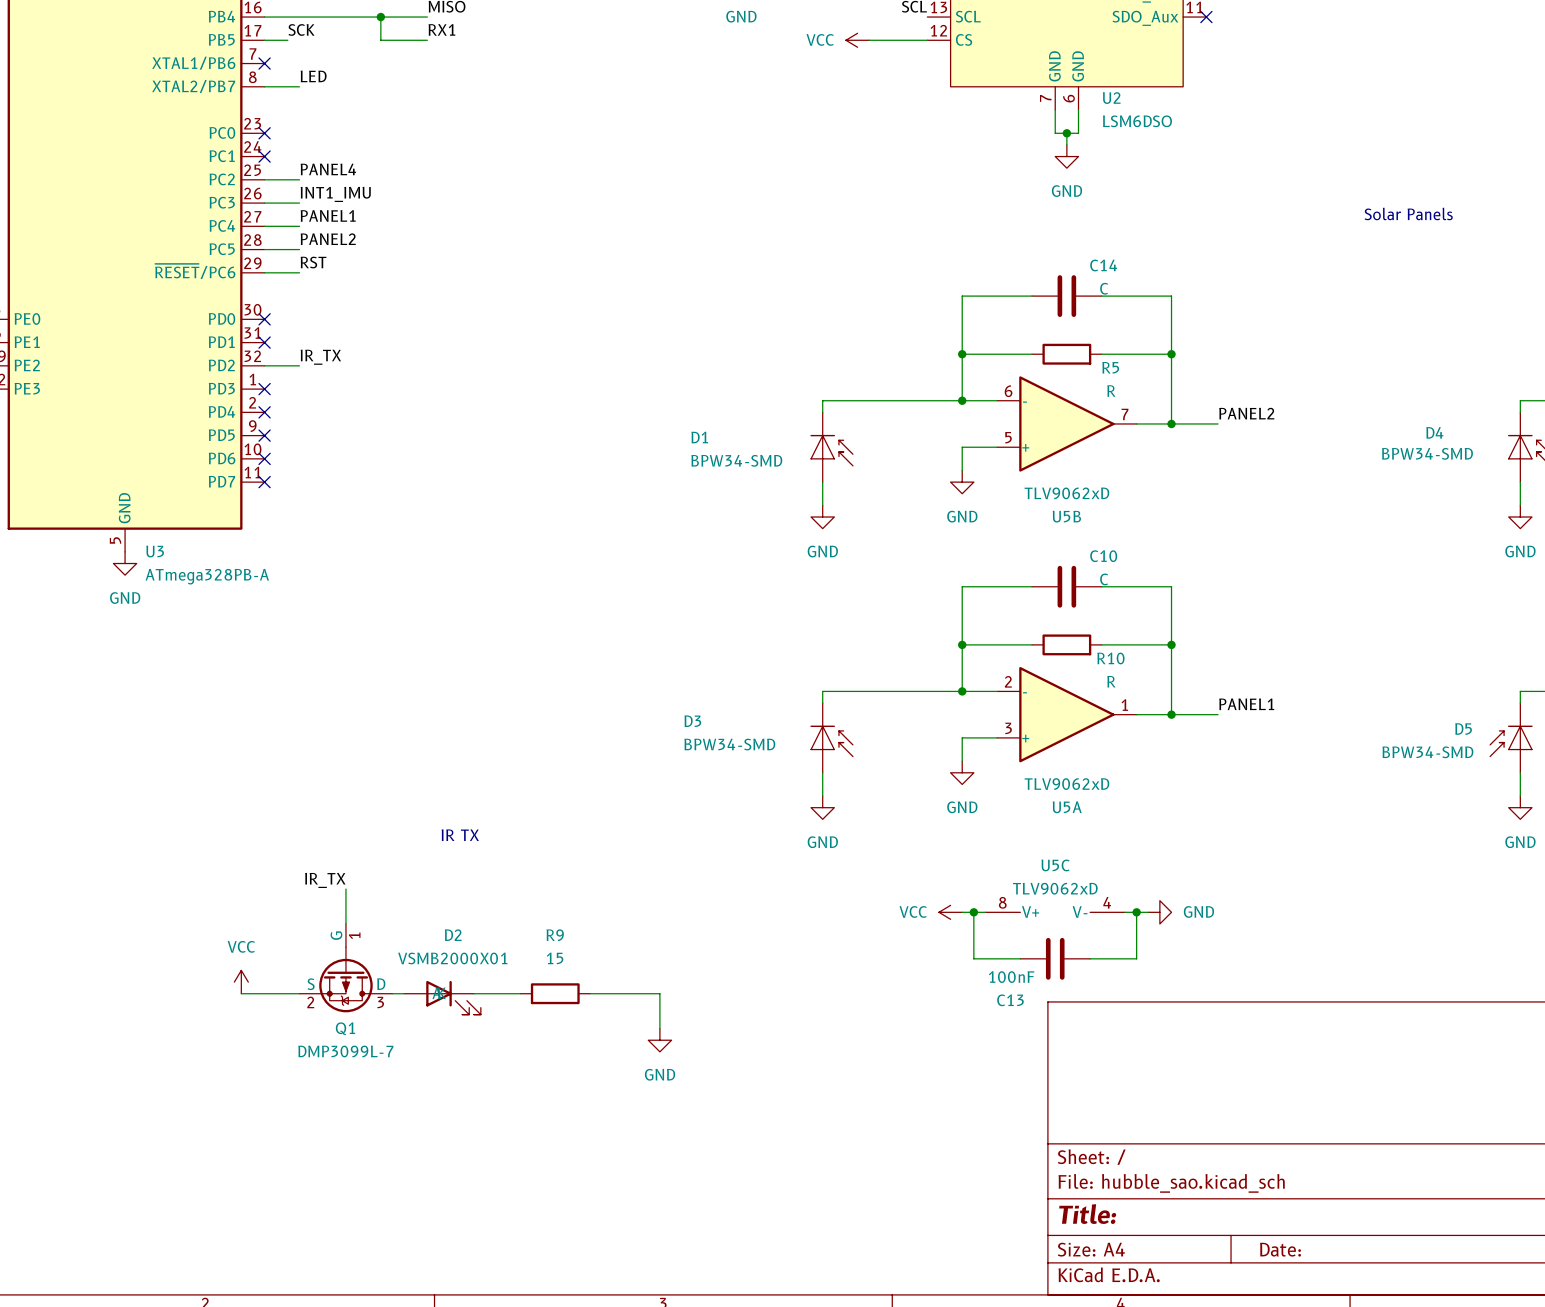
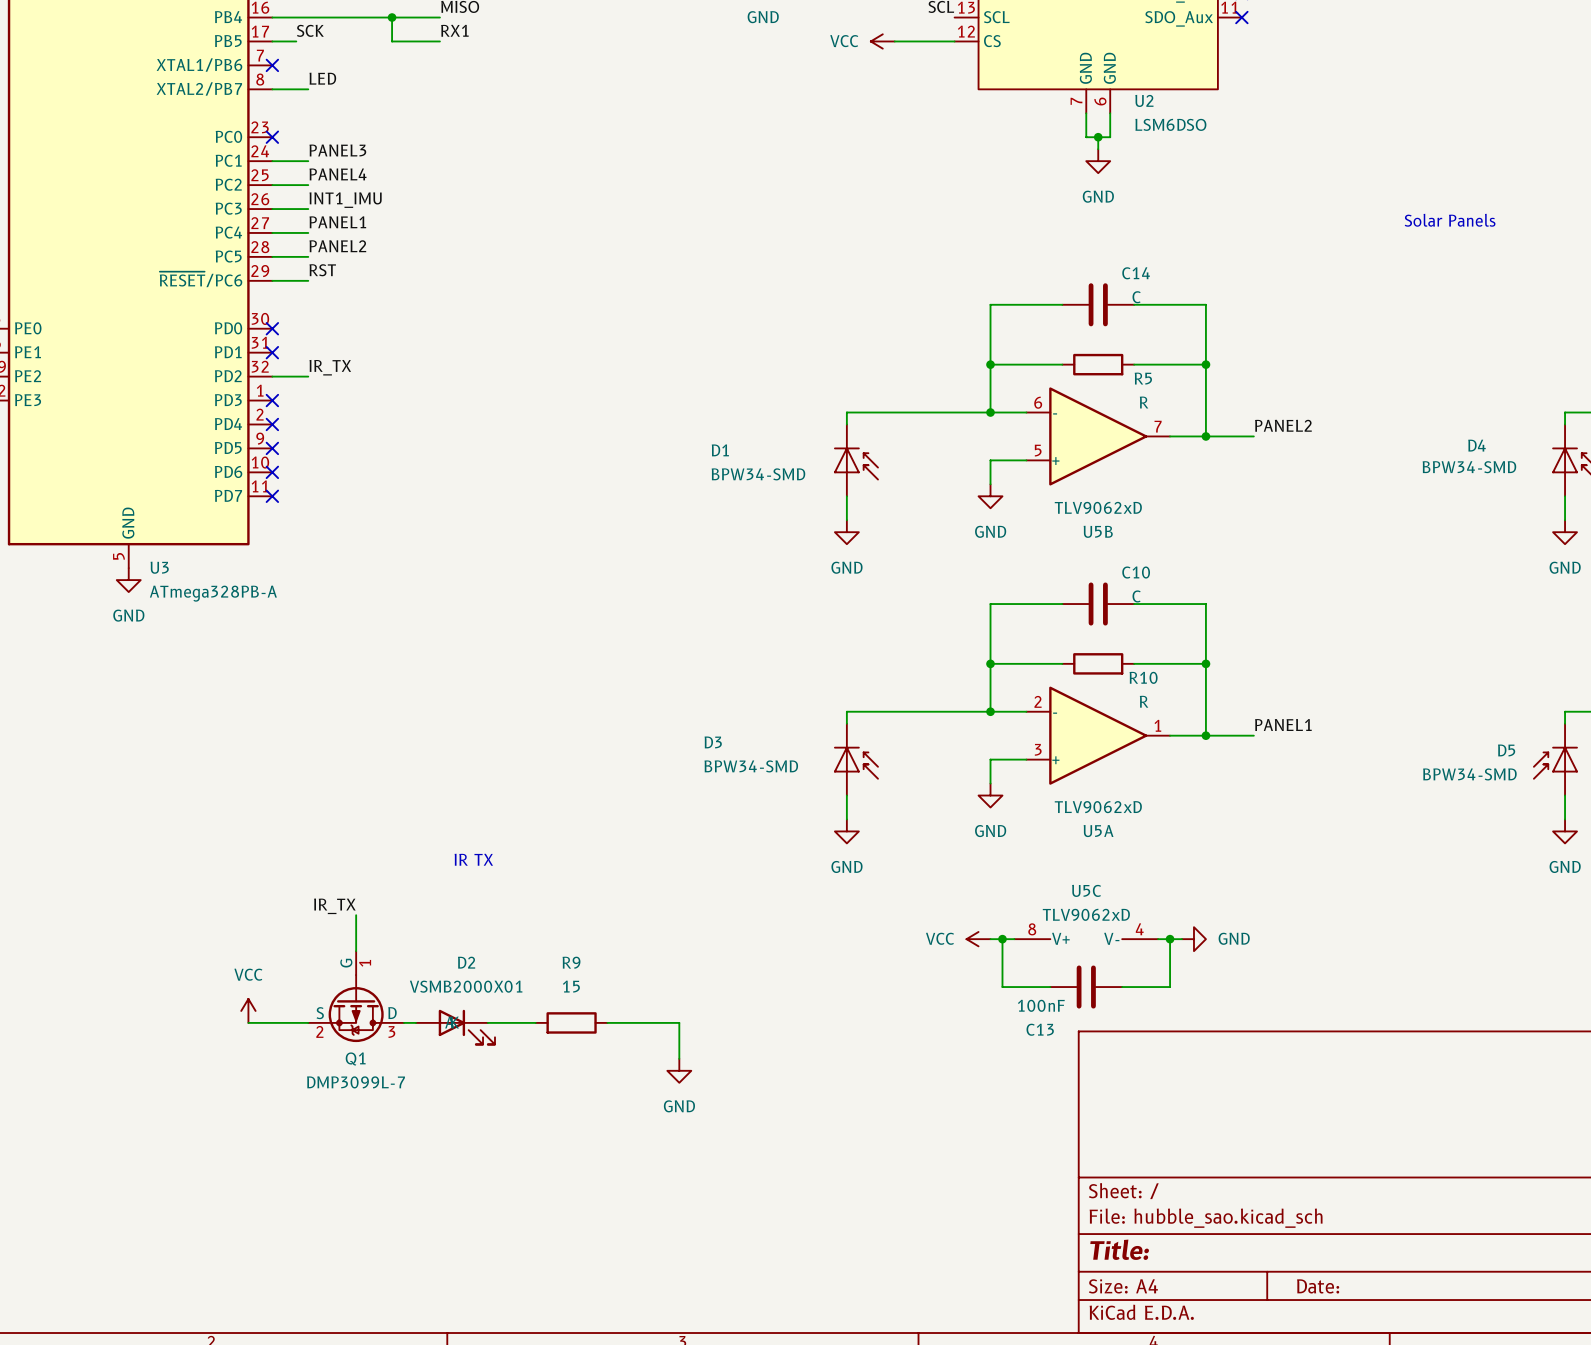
label: none -> PANEL3 (337, 150)
wire: none -> (272, 161) (308, 161)
no-connect mark: (264, 156) -> none

